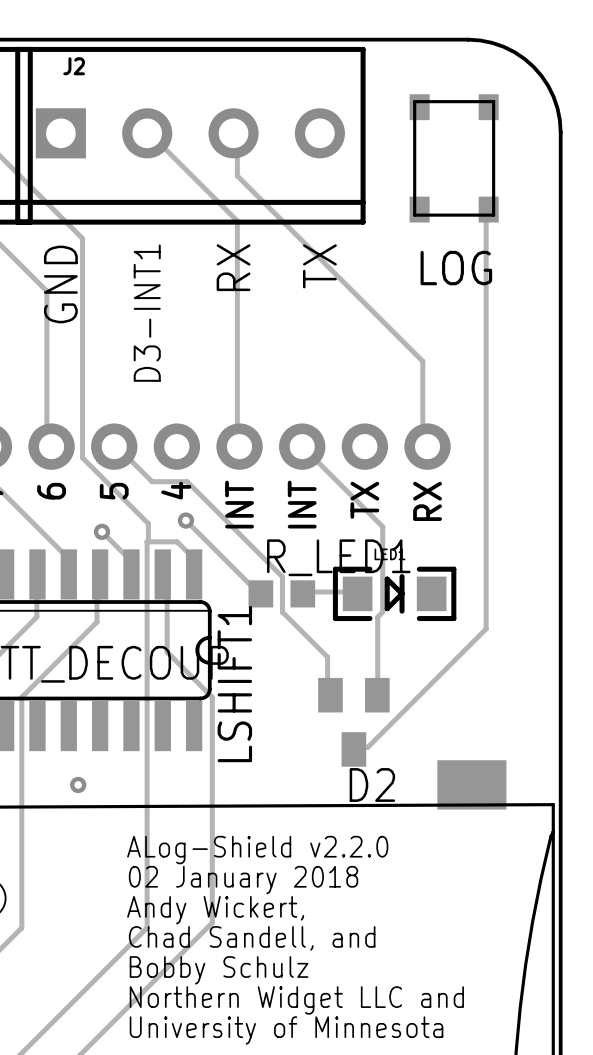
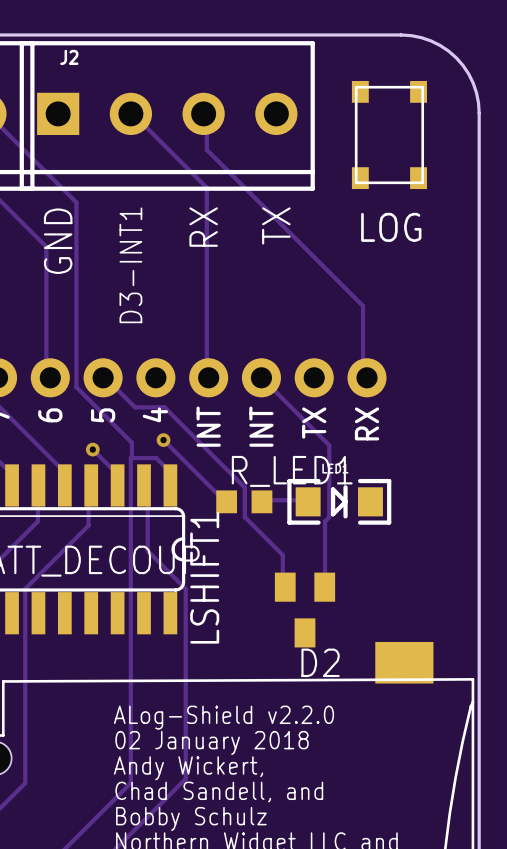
track: (488, 209) (486, 212) (486, 628) (367, 747) (354, 747) (353, 749) -> none
via: (78, 784) -> none

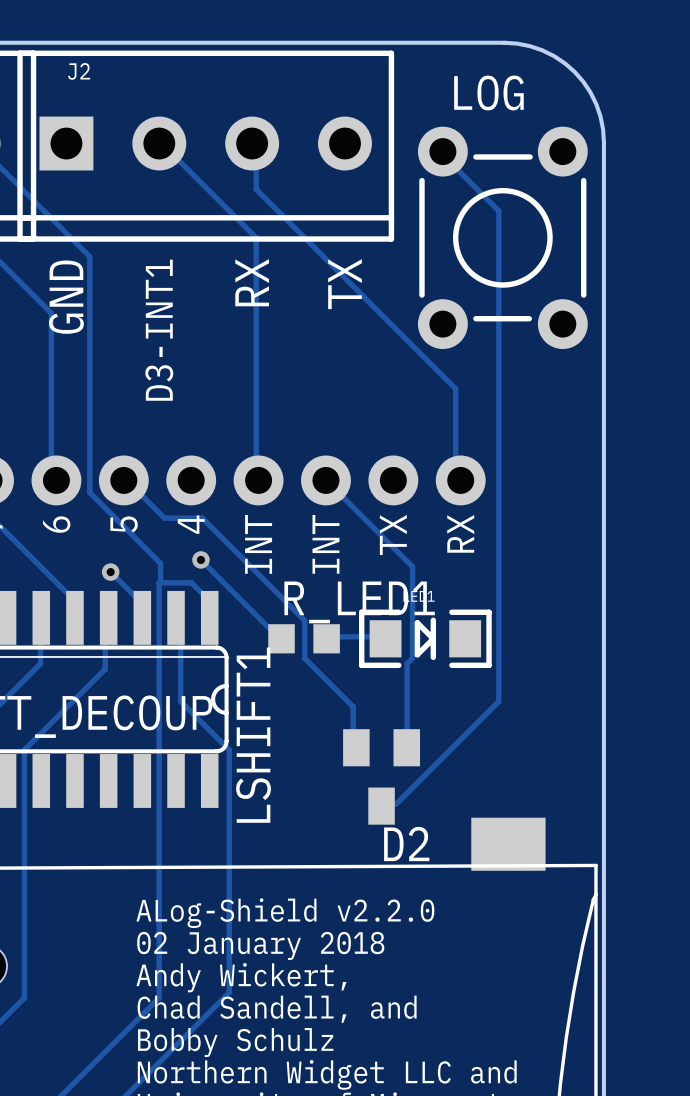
track: none -> (442, 151) (450, 162) (498, 210) (498, 701) (396, 803) (385, 803) (381, 806)
LOG: (389, 135) -> none
LOG: none -> (502, 237)

